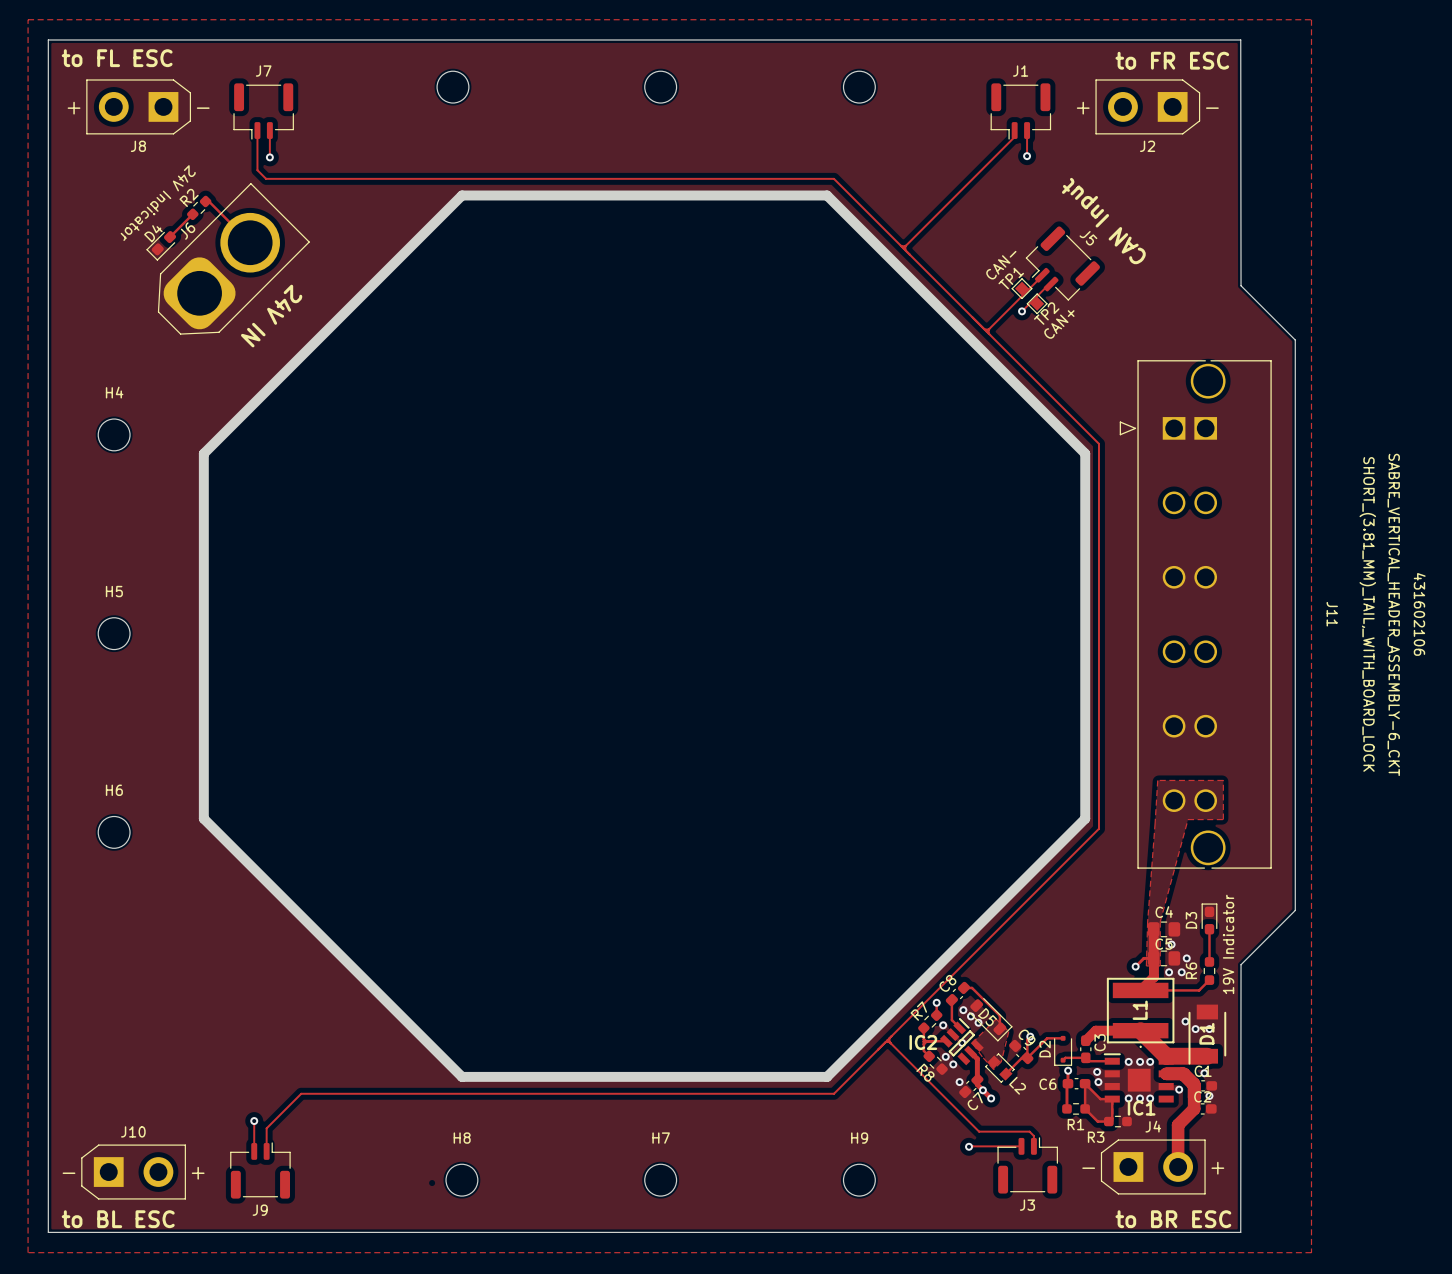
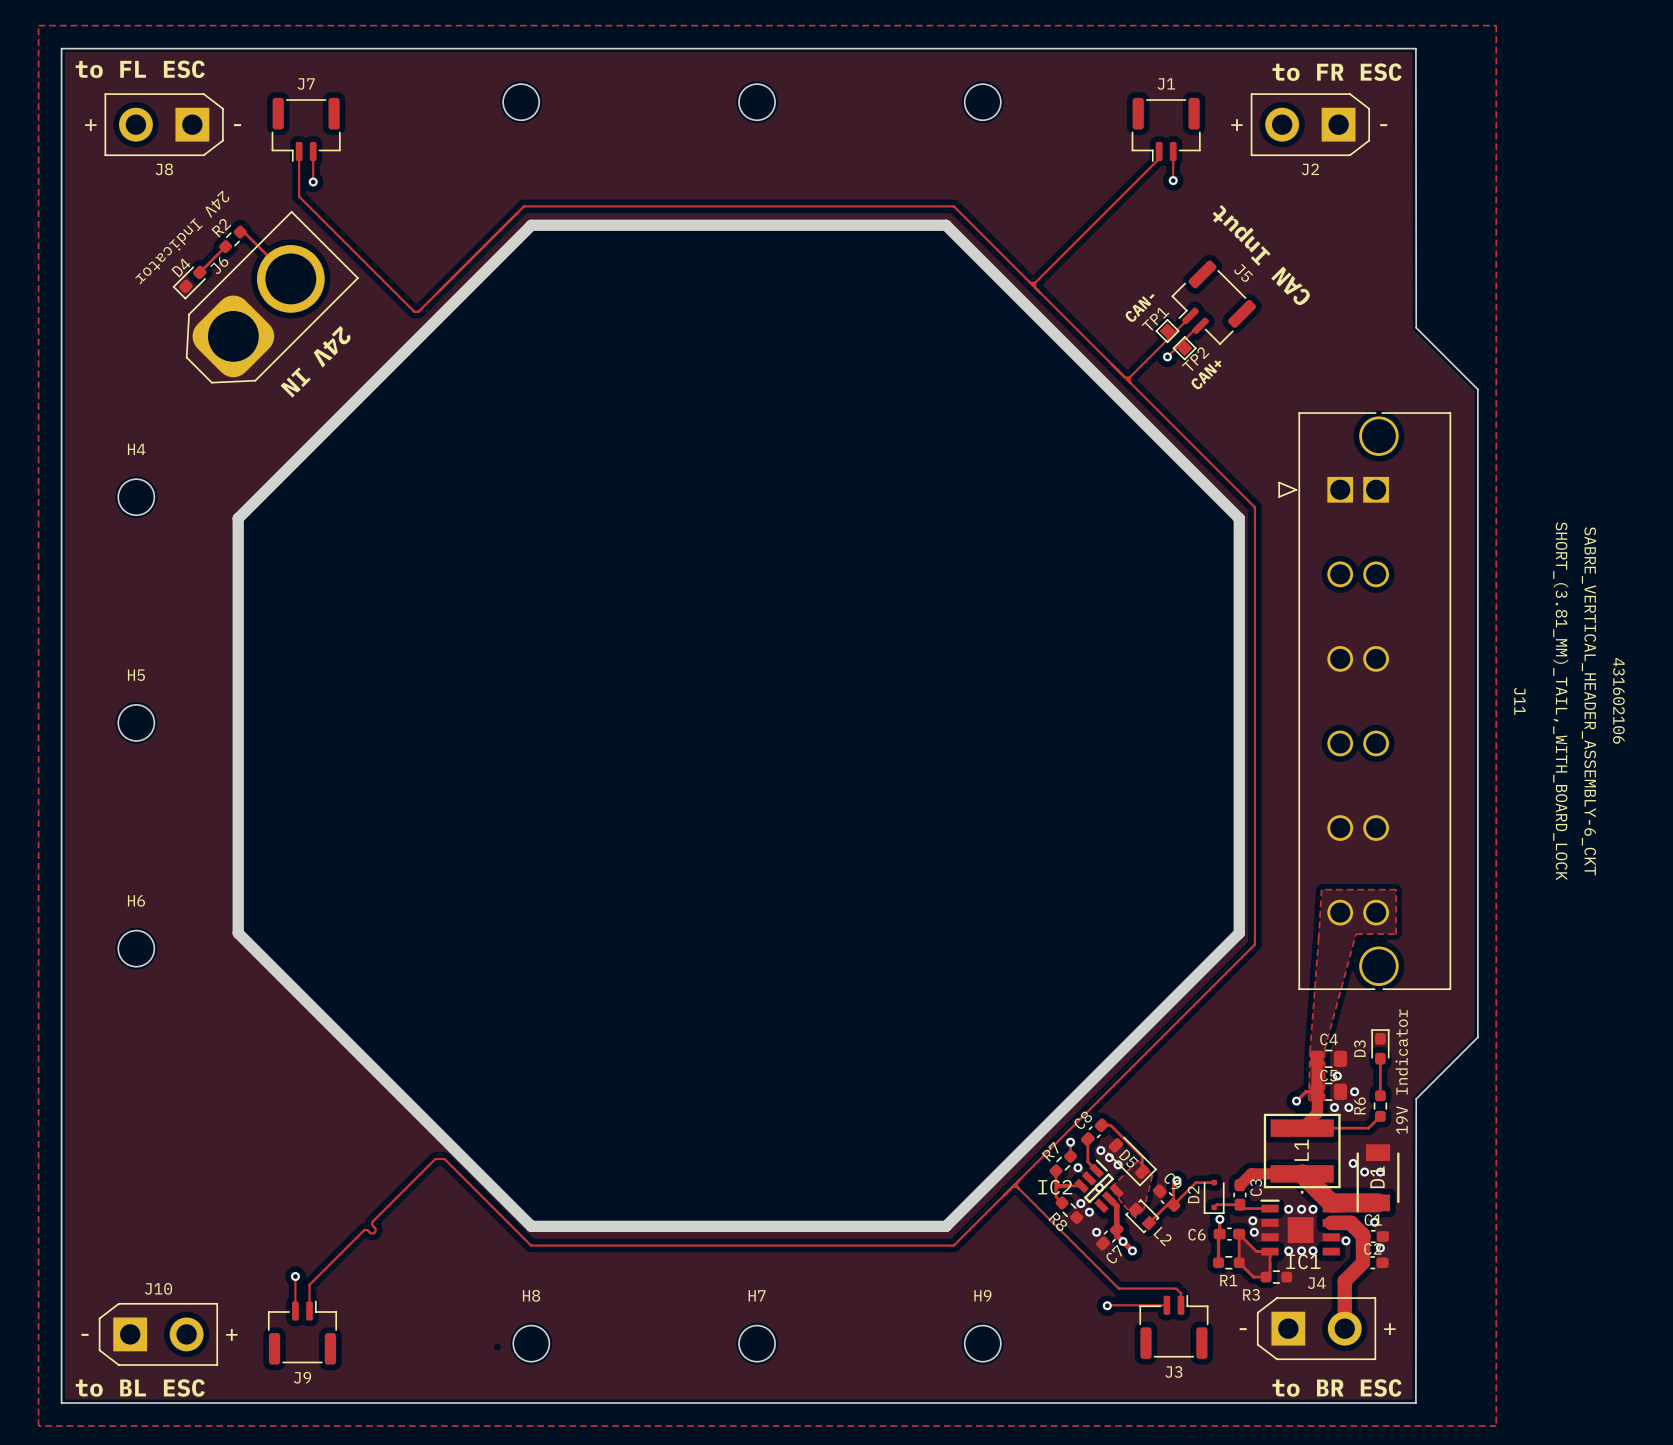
track: (266, 178) (455, 178) -> (308, 206) (414, 311) (418, 311) (523, 206)
track: (301, 1093) (461, 1093) -> (348, 1245) (364, 1230) (371, 1233) (374, 1232) (372, 1221) (435, 1159) (444, 1159) (531, 1245)

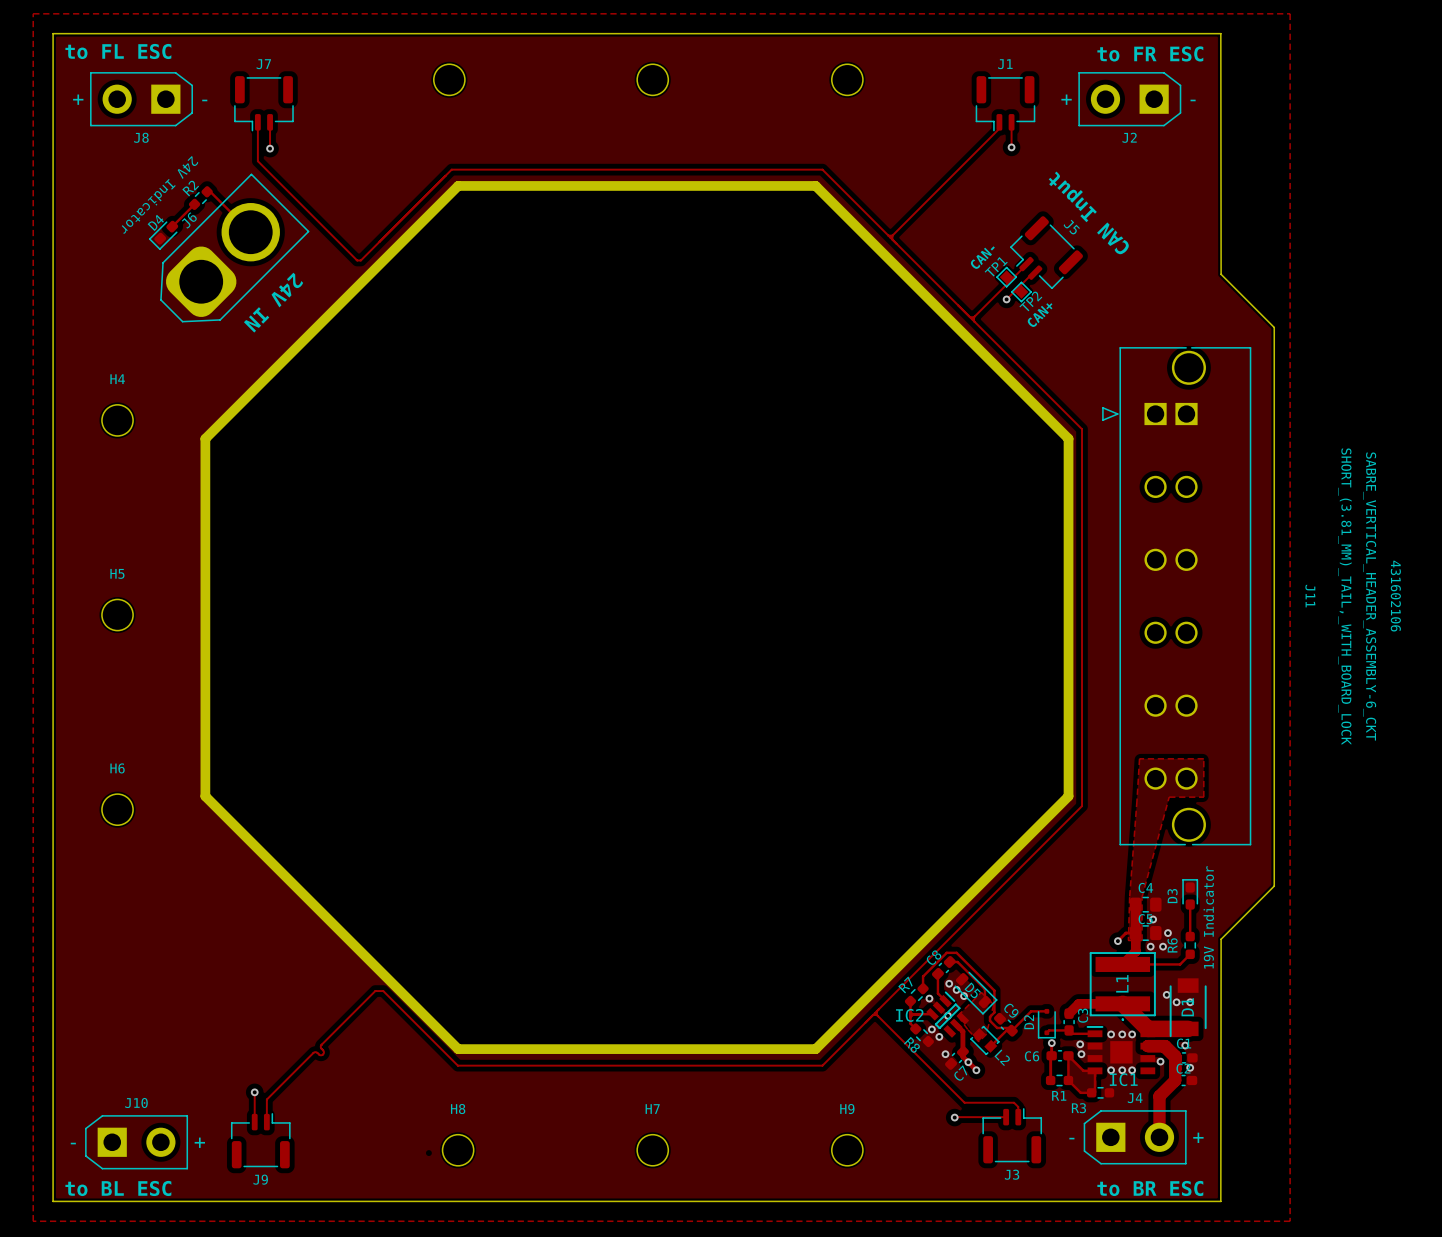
via: (1070, 1142) -> none
track: (1176, 1180) (1173, 1183) (1173, 1204) -> (923, 976) (946, 952) (956, 952) (994, 990) (994, 1012) (990, 1016) (990, 1020) (997, 1027) (1009, 1027) (1011, 1030)
via: (1176, 1180) -> none

